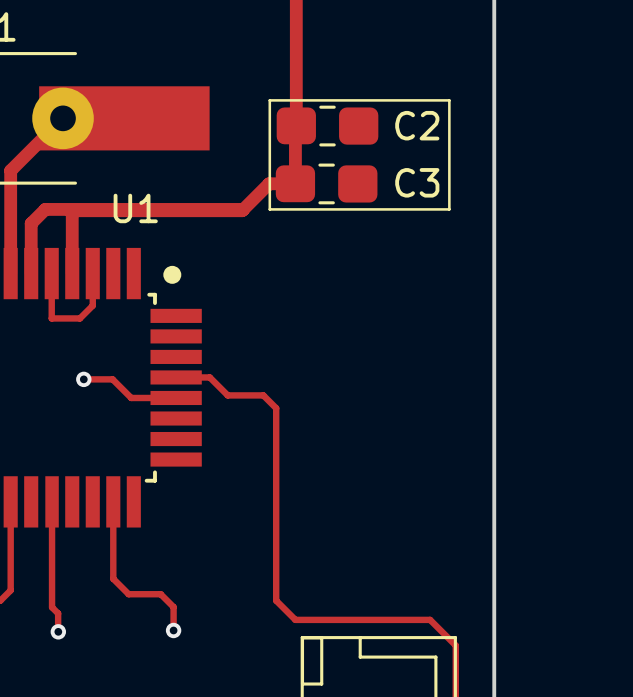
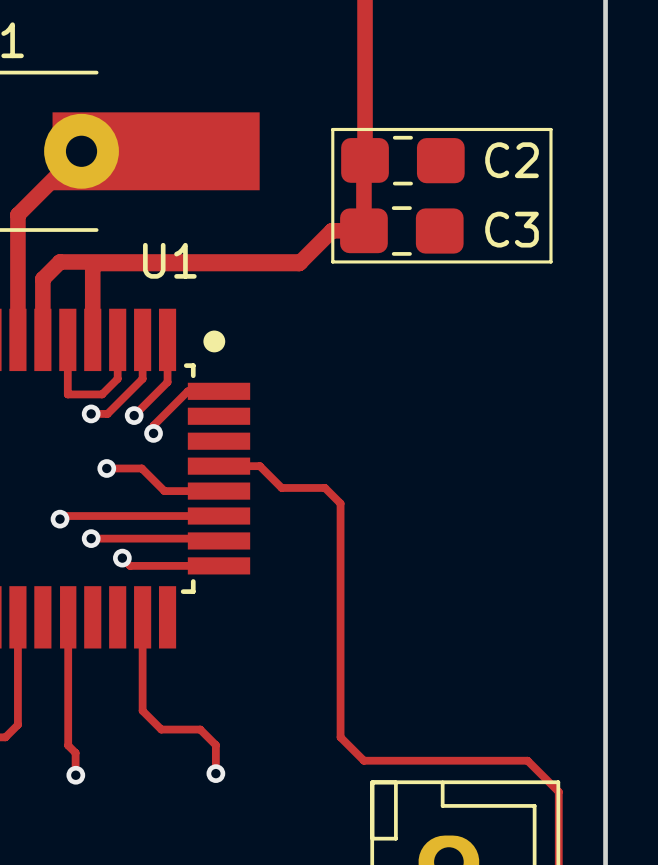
track: none -> (142, 339) (142, 378) (107, 413) (91, 413)
track: none -> (167, 339) (167, 382) (134, 415)
track: none -> (218, 391) (187, 391) (153, 425) (153, 433)
via: none -> (91, 413)
via: none -> (134, 415)
via: none -> (153, 433)
track: none -> (218, 516) (63, 516) (60, 519)
via: none -> (60, 519)
track: none -> (91, 538) (216, 538)
via: none -> (91, 538)
track: none -> (122, 558) (130, 565) (218, 565)
via: none -> (122, 558)

